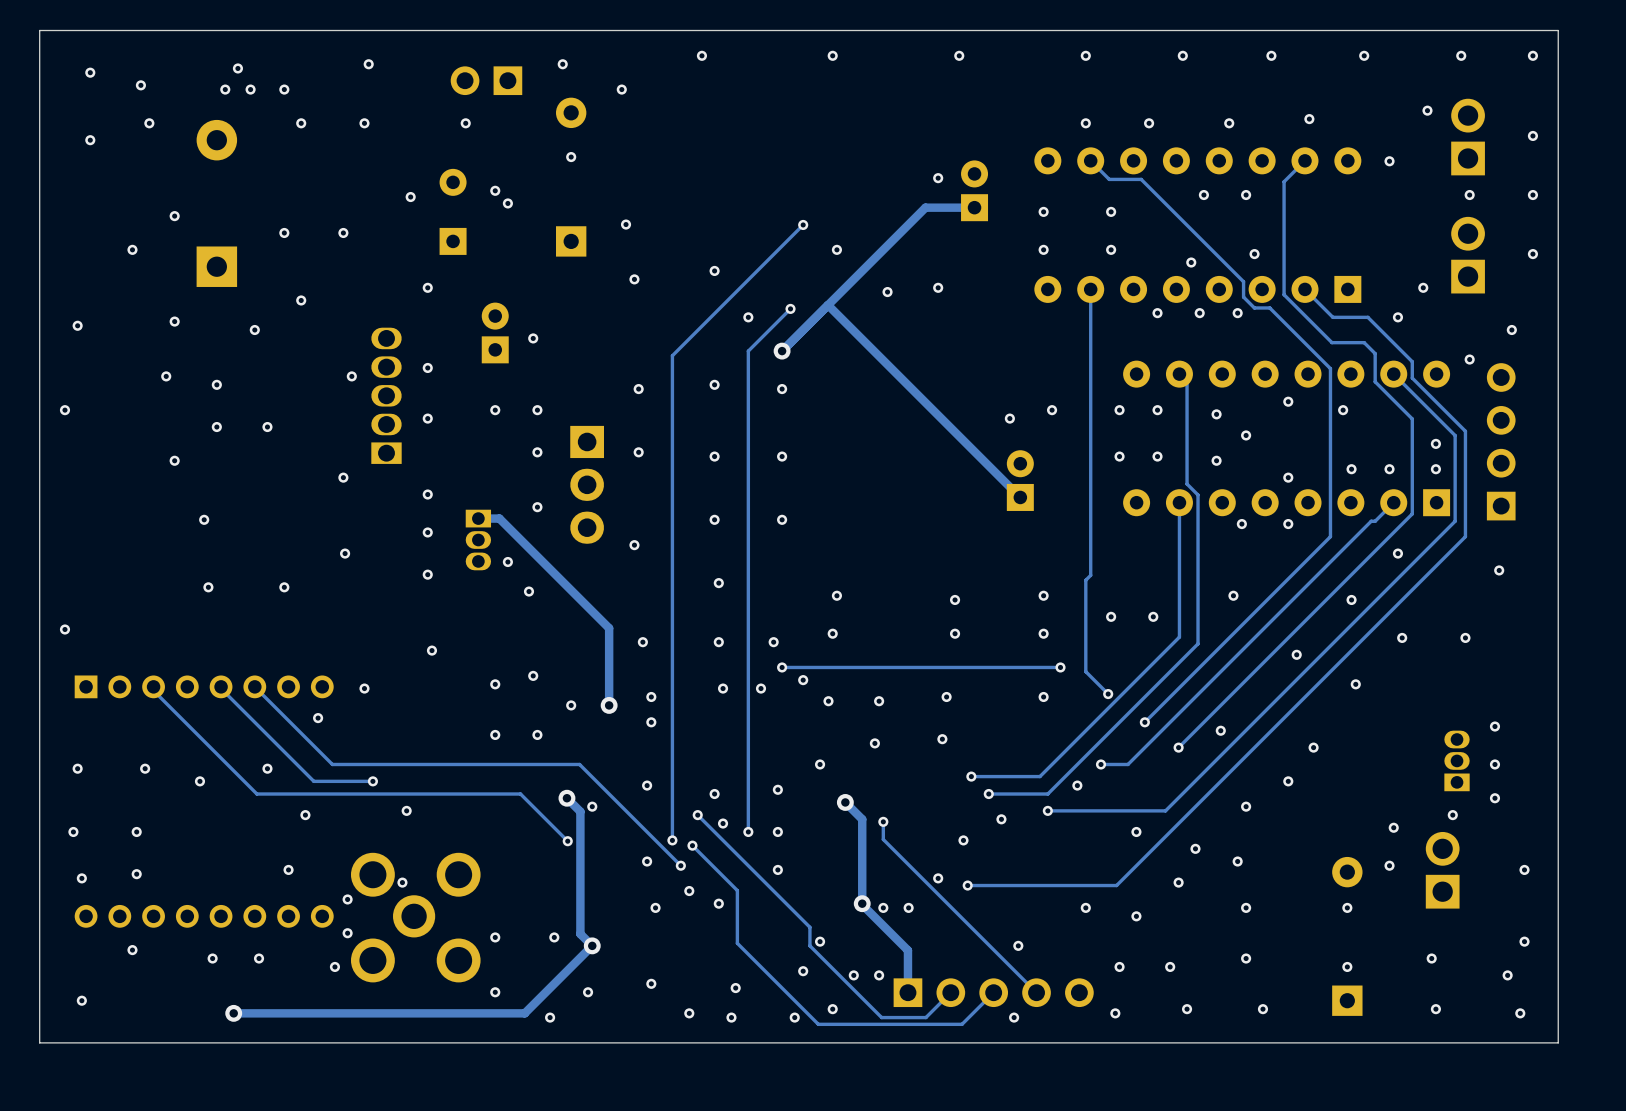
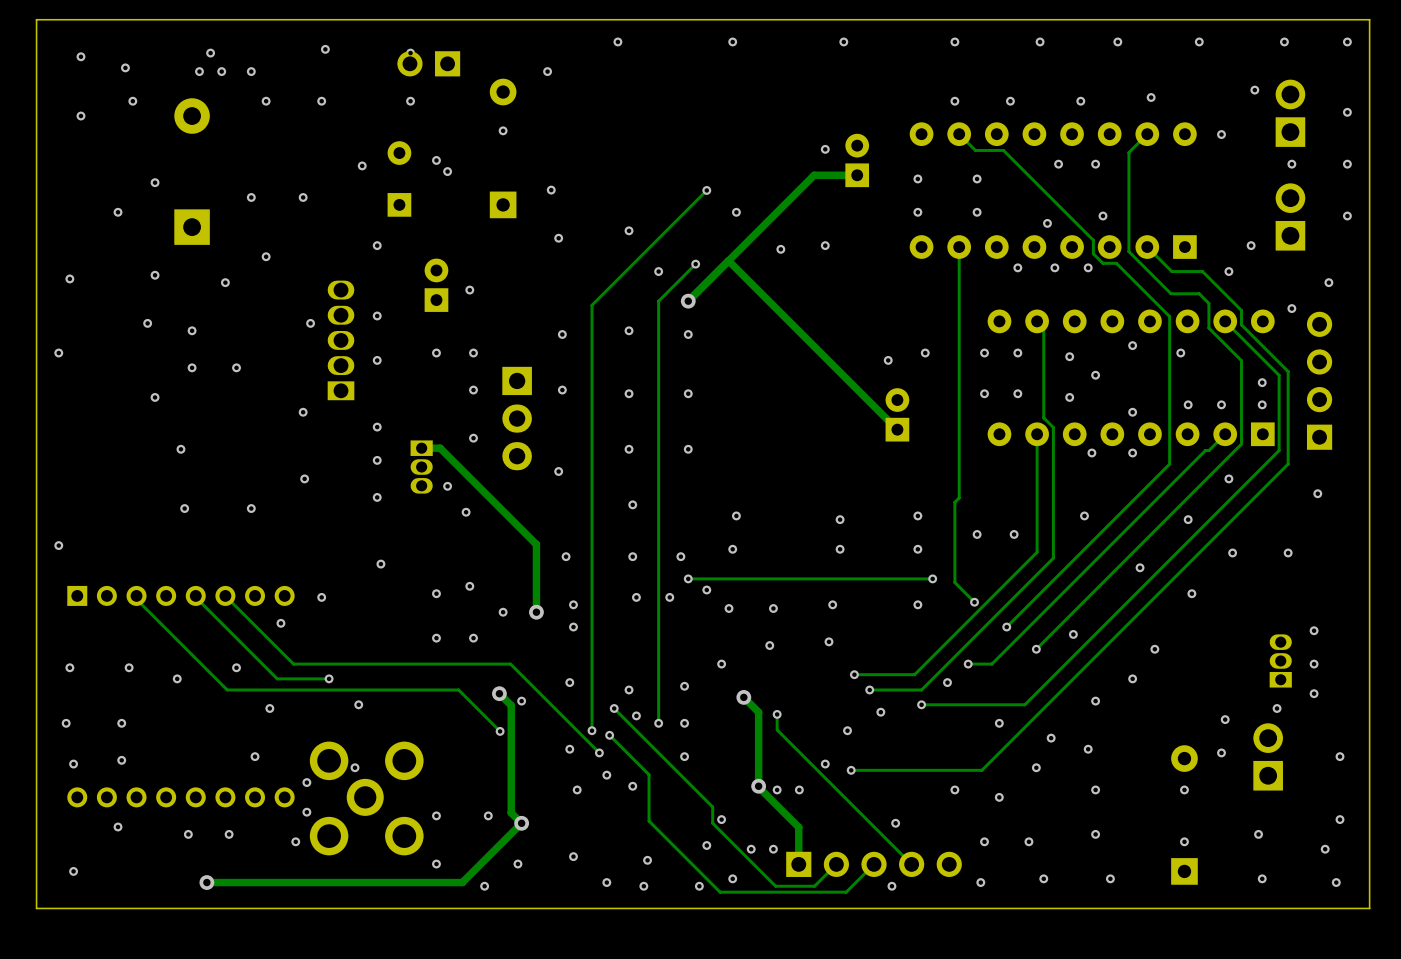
via position: (562, 64) -> (410, 53)

